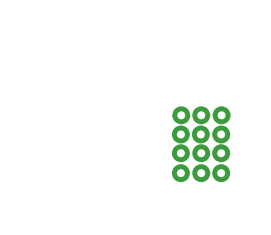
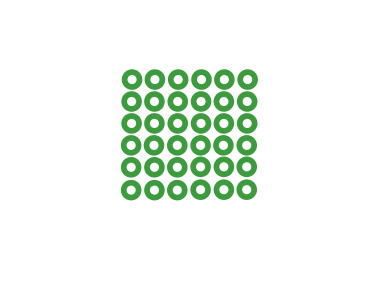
via: none -> (132, 79)
via: none -> (154, 79)
via: none -> (178, 79)
via: none -> (201, 79)
via: none -> (224, 79)
via: none -> (247, 79)
via: none -> (131, 101)
via: none -> (154, 101)
via: none -> (177, 101)
via: none -> (201, 101)
via: none -> (223, 101)
via: none -> (247, 101)
via: none -> (131, 123)
via: none -> (154, 123)
via: none -> (177, 123)
via: none -> (131, 145)
via: none -> (153, 145)
via: none -> (177, 145)
via: none -> (131, 167)
via: none -> (154, 167)
via: none -> (177, 167)
via: none -> (131, 190)
via: none -> (154, 190)
via: none -> (177, 190)

